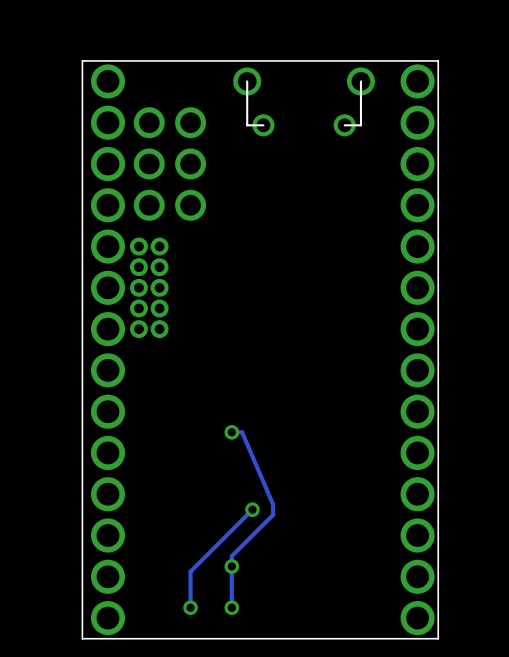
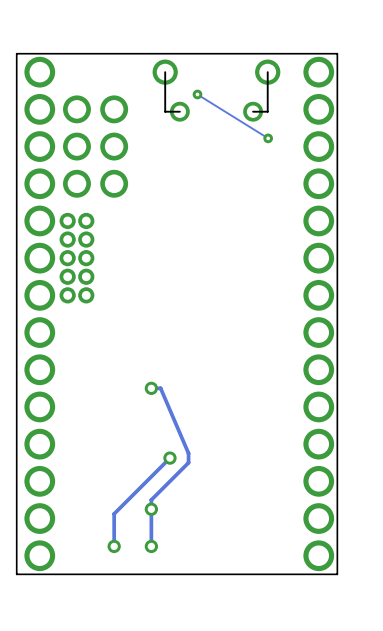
track: none -> (197, 94) (268, 138)
via: none -> (197, 94)
via: none -> (268, 138)

